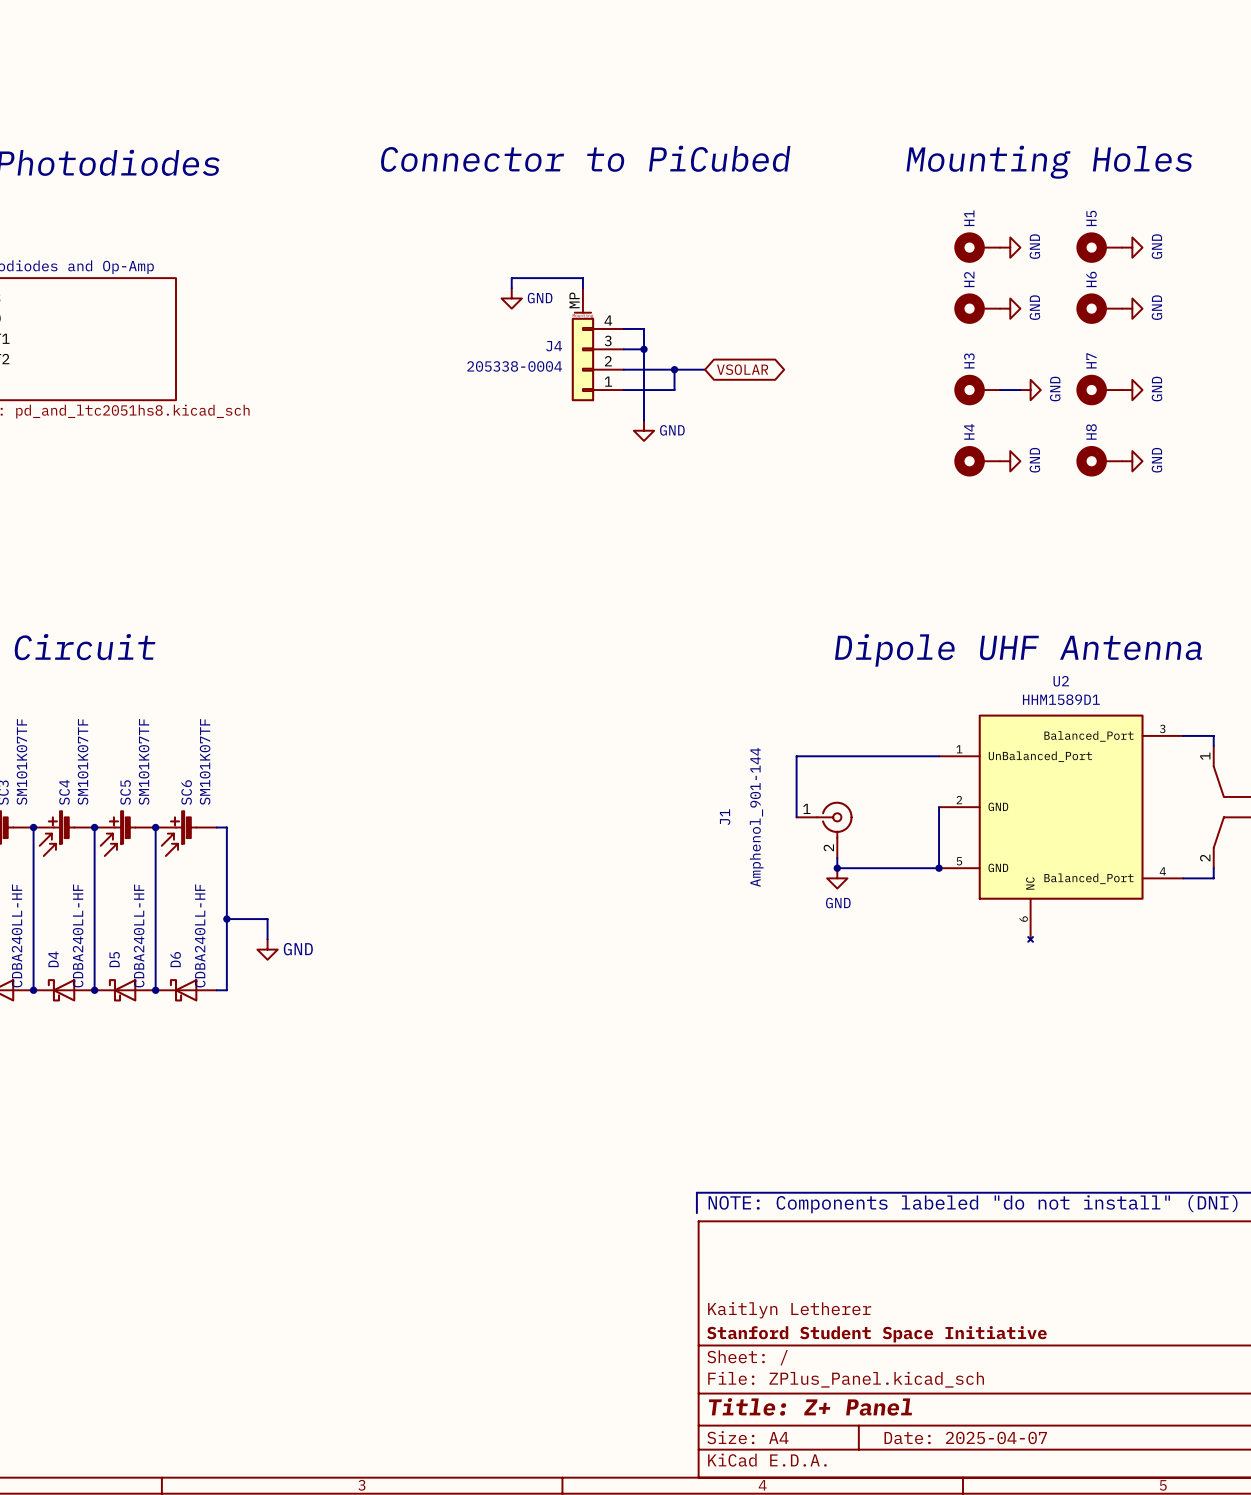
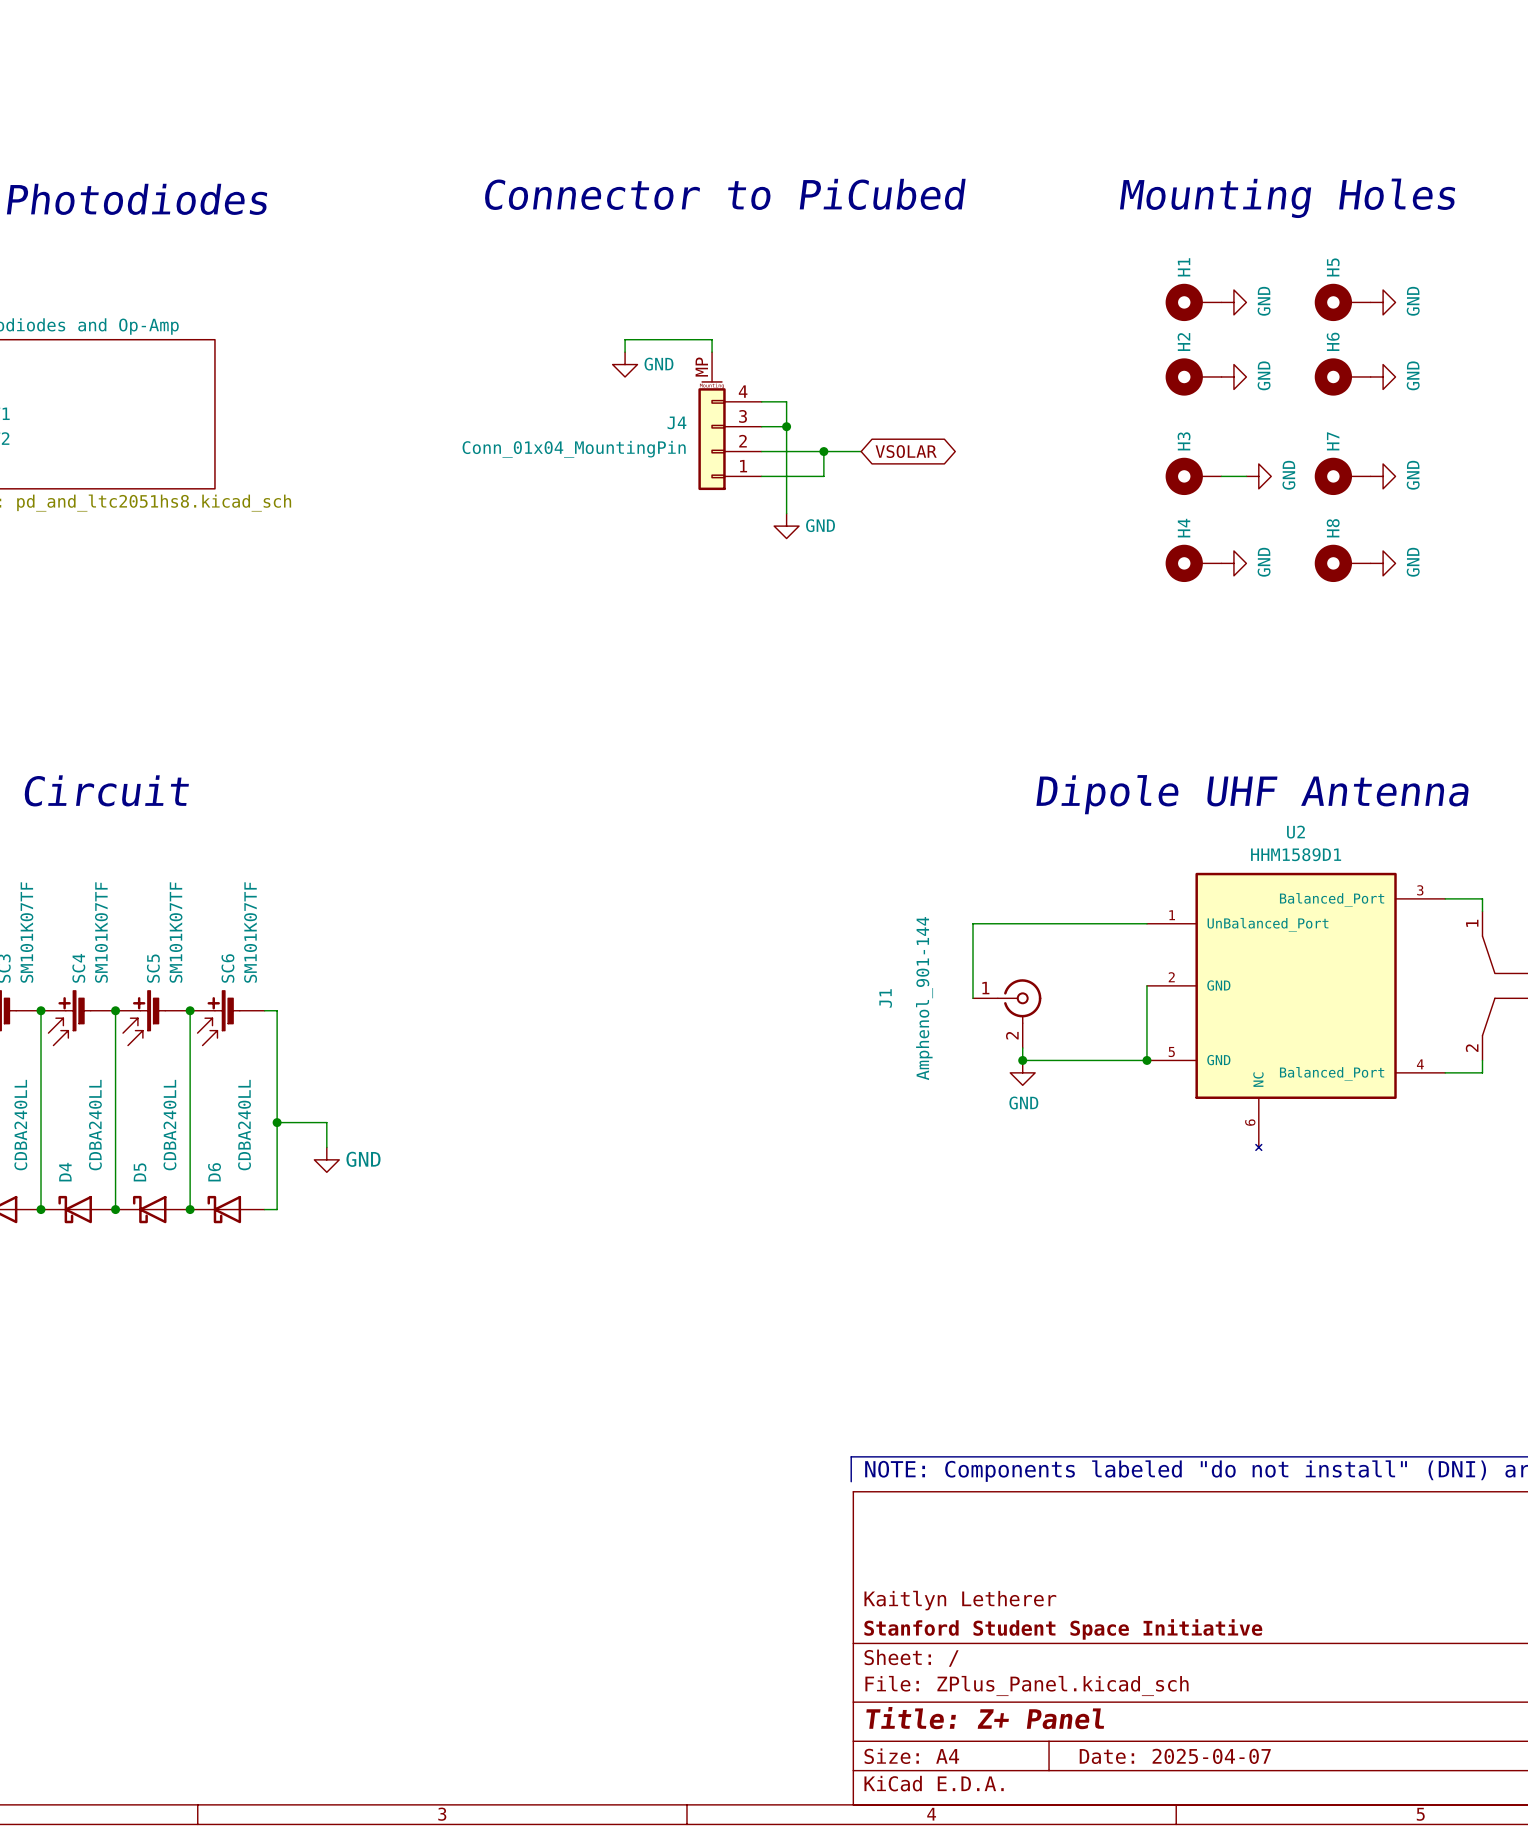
J4 value: 205338-0004 (514, 366) -> Conn_01x04_MountingPin (574, 449)
part value: CDBA240LL-HF (17, 935) -> CDBA240LL (20, 1125)
D4 value: CDBA240LL-HF (78, 935) -> CDBA240LL (95, 1125)
D5 value: CDBA240LL-HF (139, 935) -> CDBA240LL (169, 1125)
D6 value: CDBA240LL-HF (200, 935) -> CDBA240LL (244, 1125)

